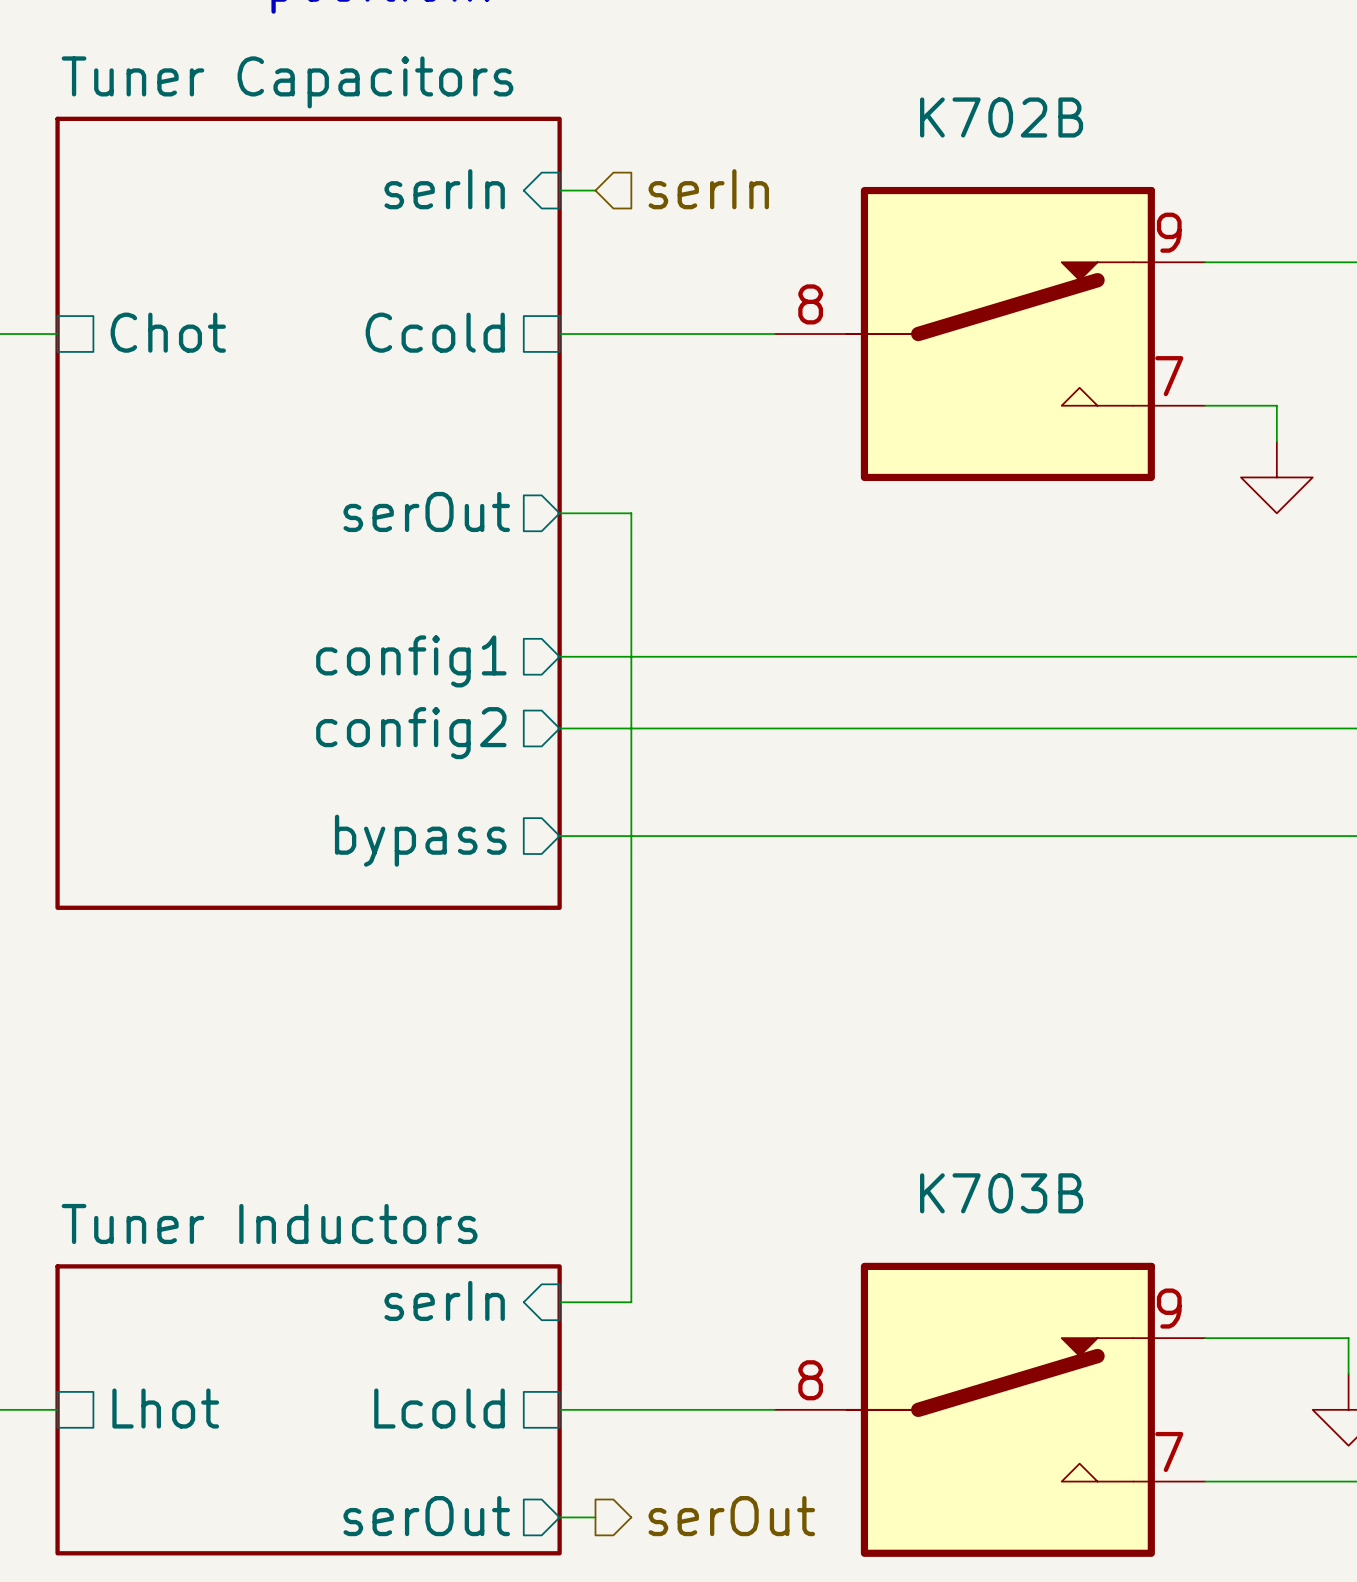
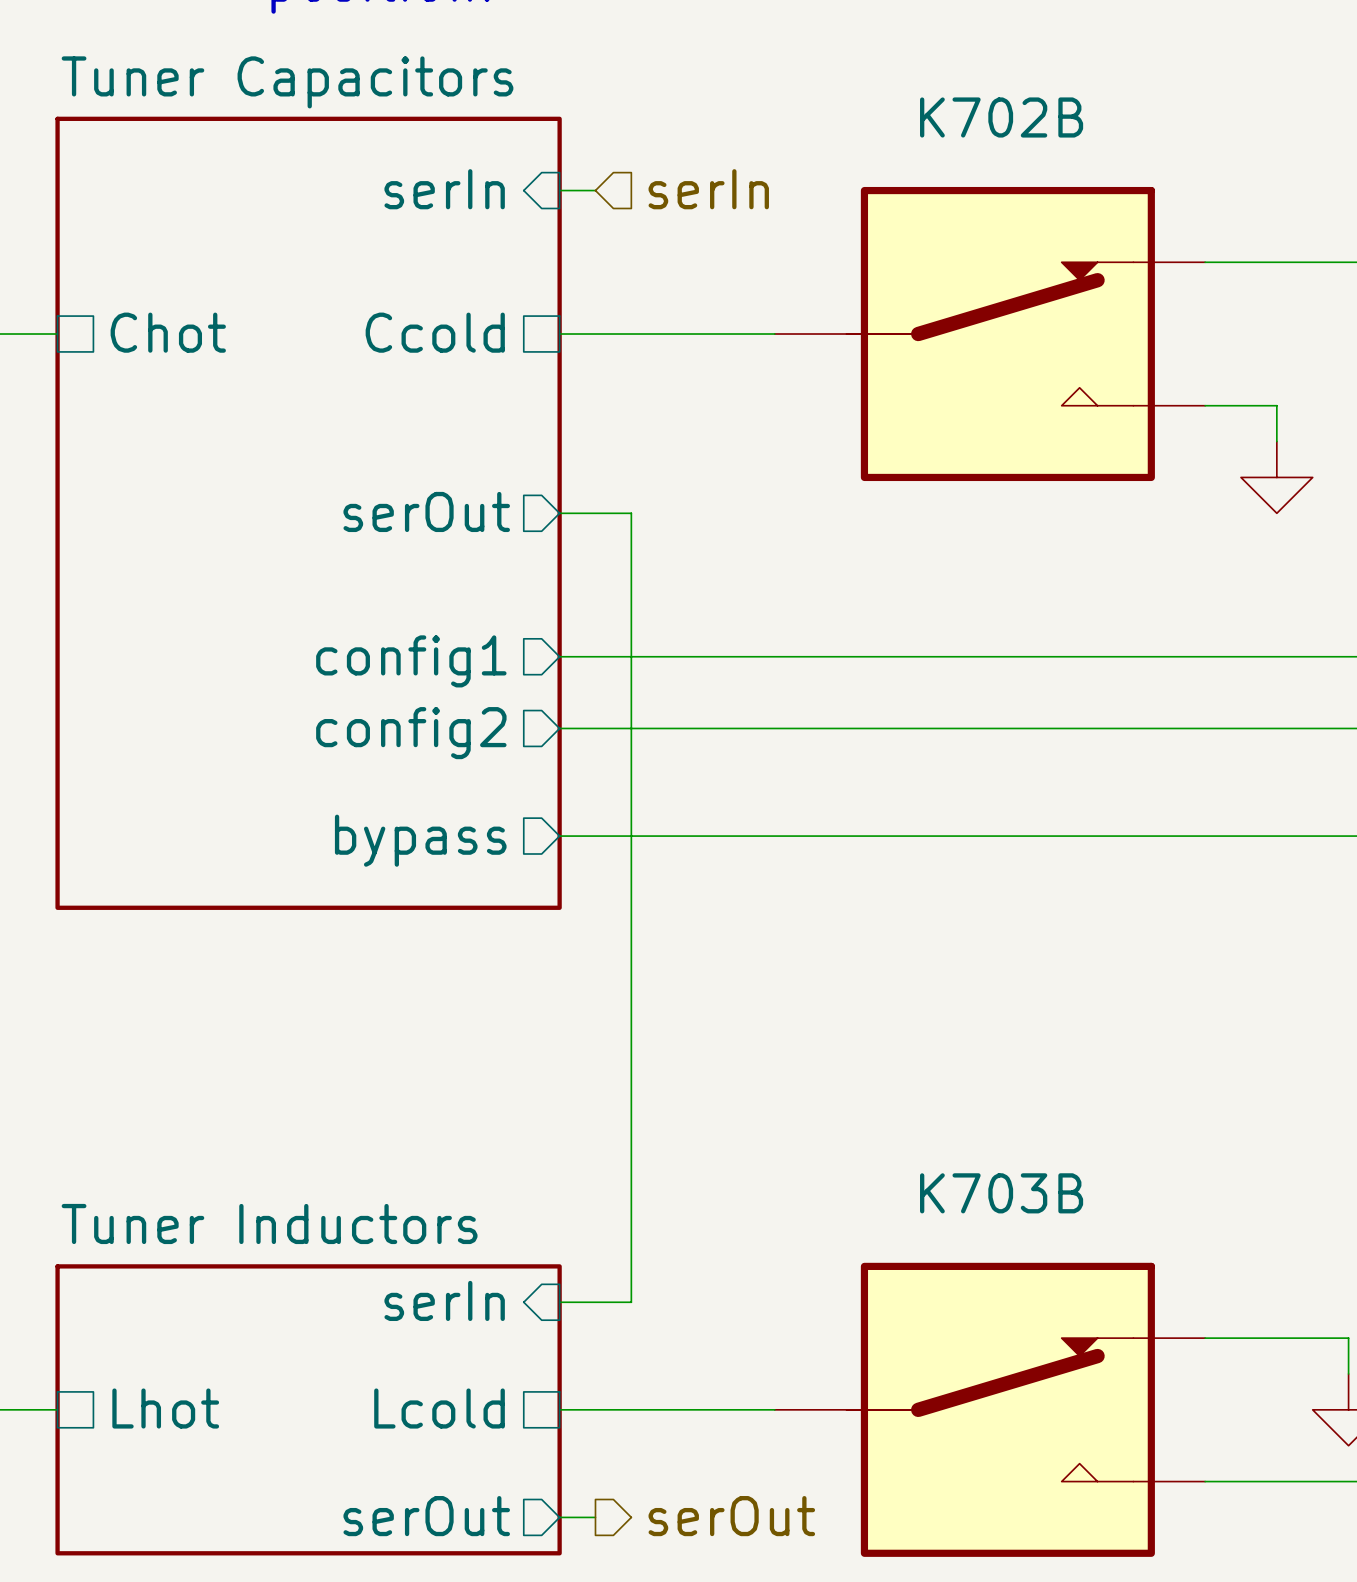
K702B pin number: 9 (1169, 232) -> none
K702B pin number: 8 (810, 304) -> none
K702B pin number: 7 (1169, 376) -> none
K703B pin number: 9 (1169, 1308) -> none
K703B pin number: 8 (810, 1380) -> none
K703B pin number: 7 (1169, 1451) -> none

